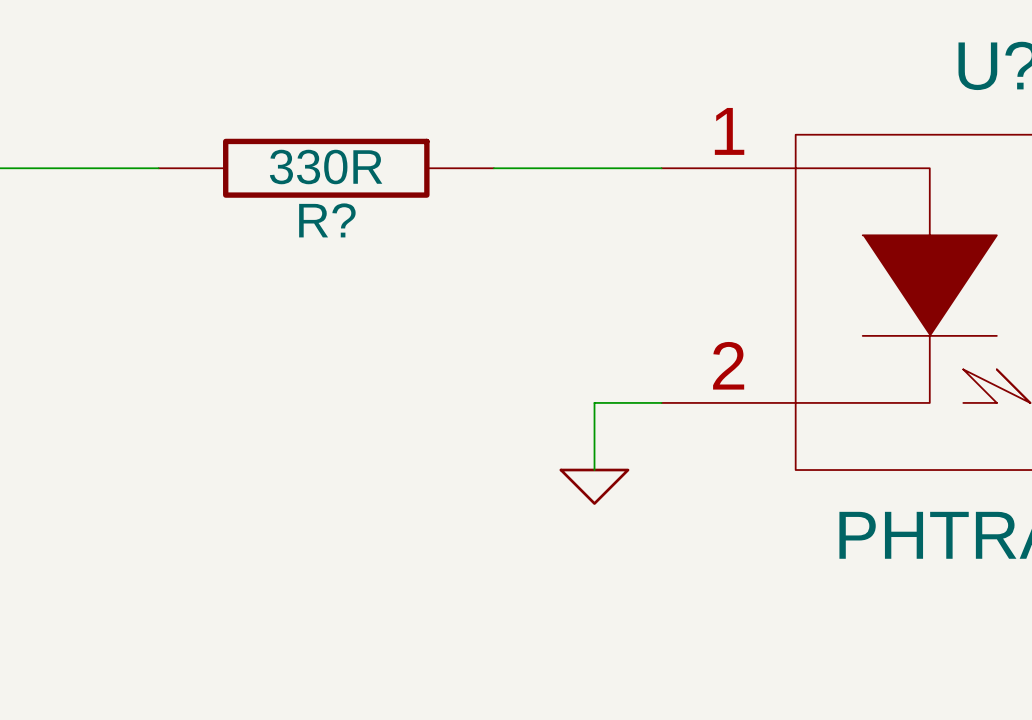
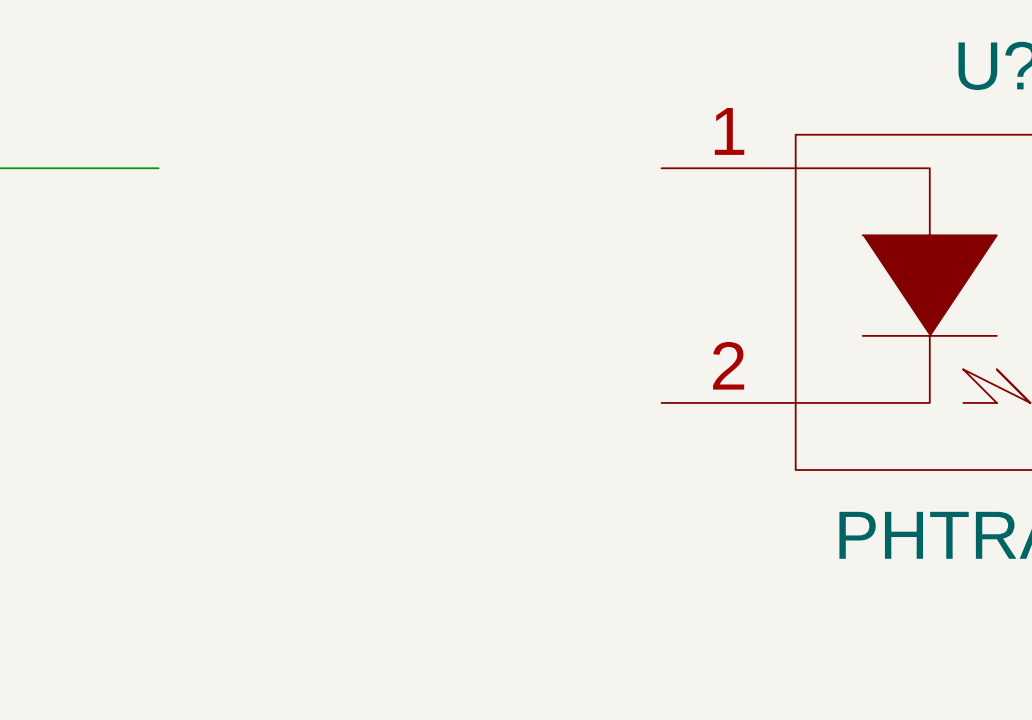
R?: 330R (326, 168) -> none
wire: (493, 168) (661, 168) -> none
wire: (661, 402) (594, 402) (594, 470) -> none
power symbol: (594, 486) -> none

